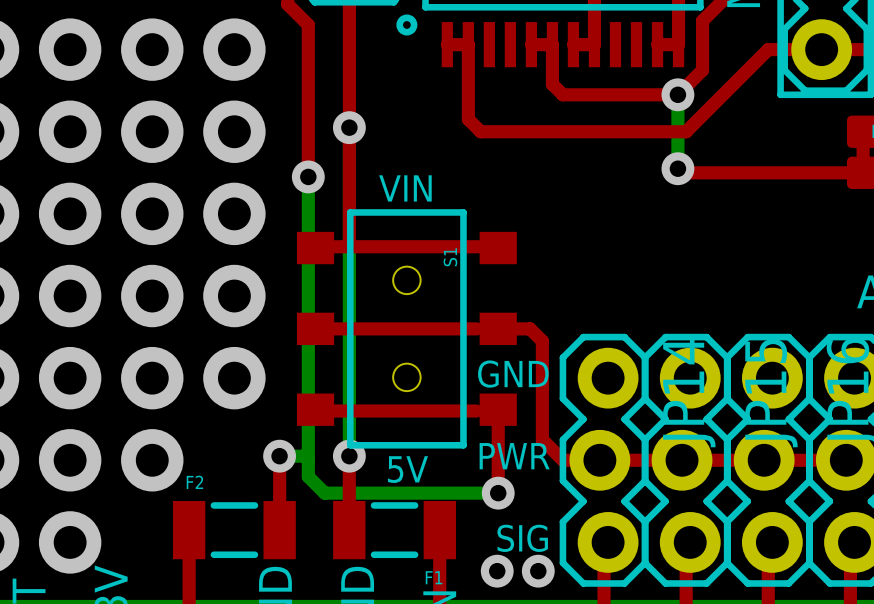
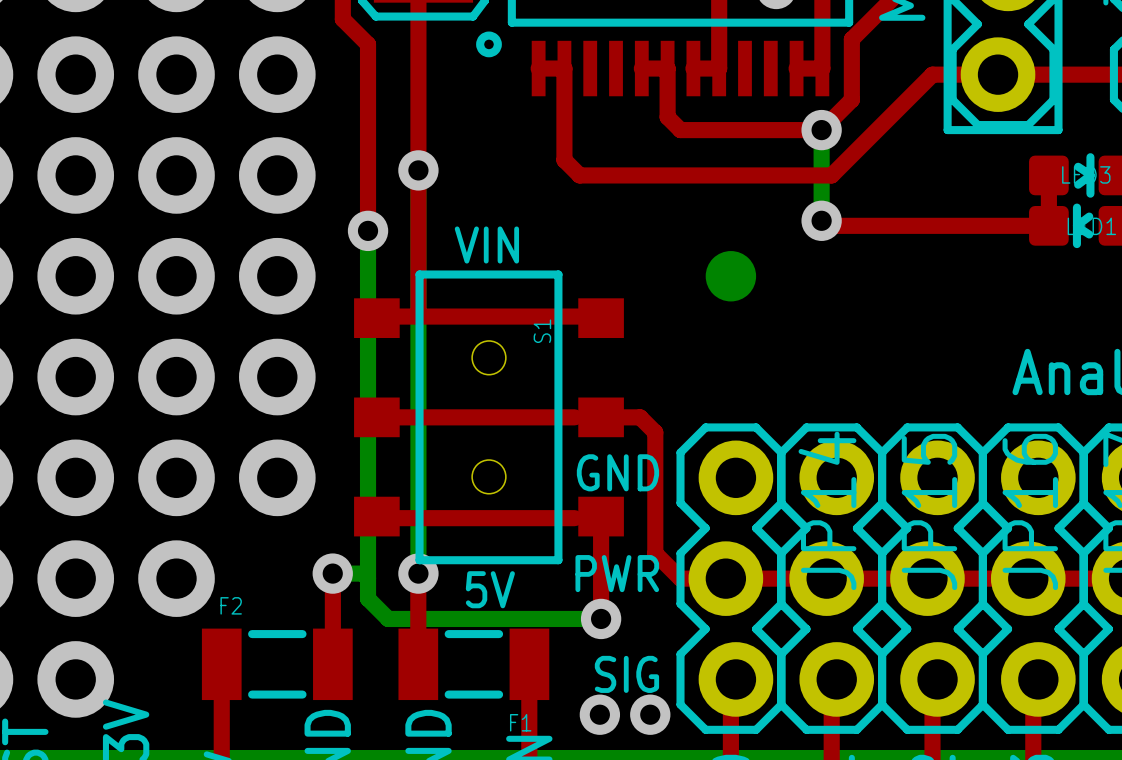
part: none -> (730, 276)

